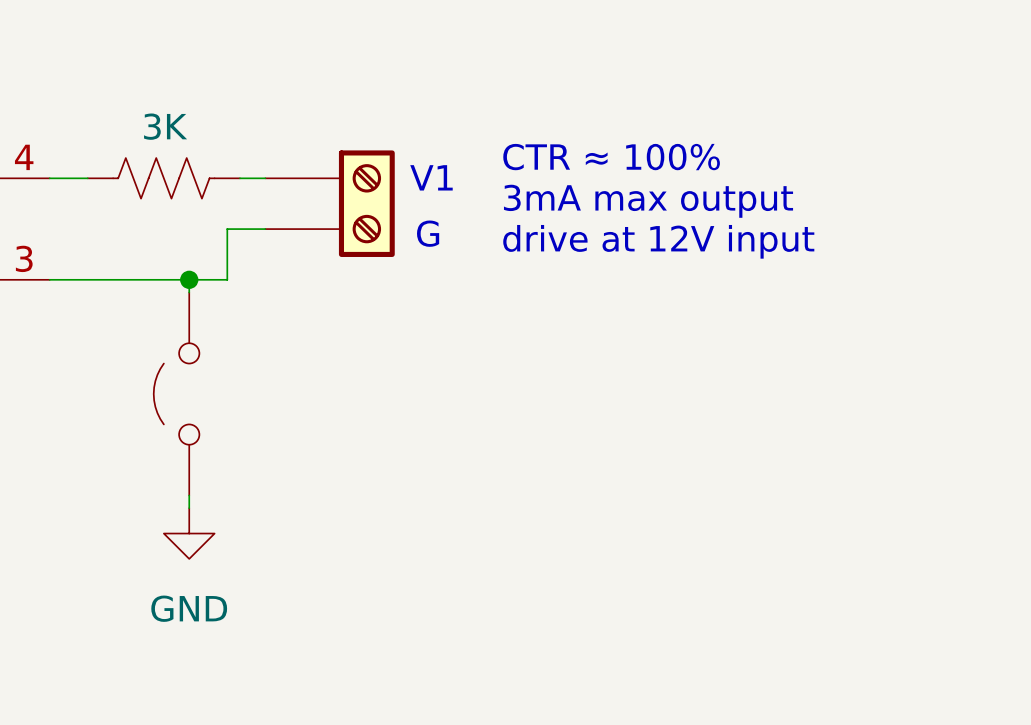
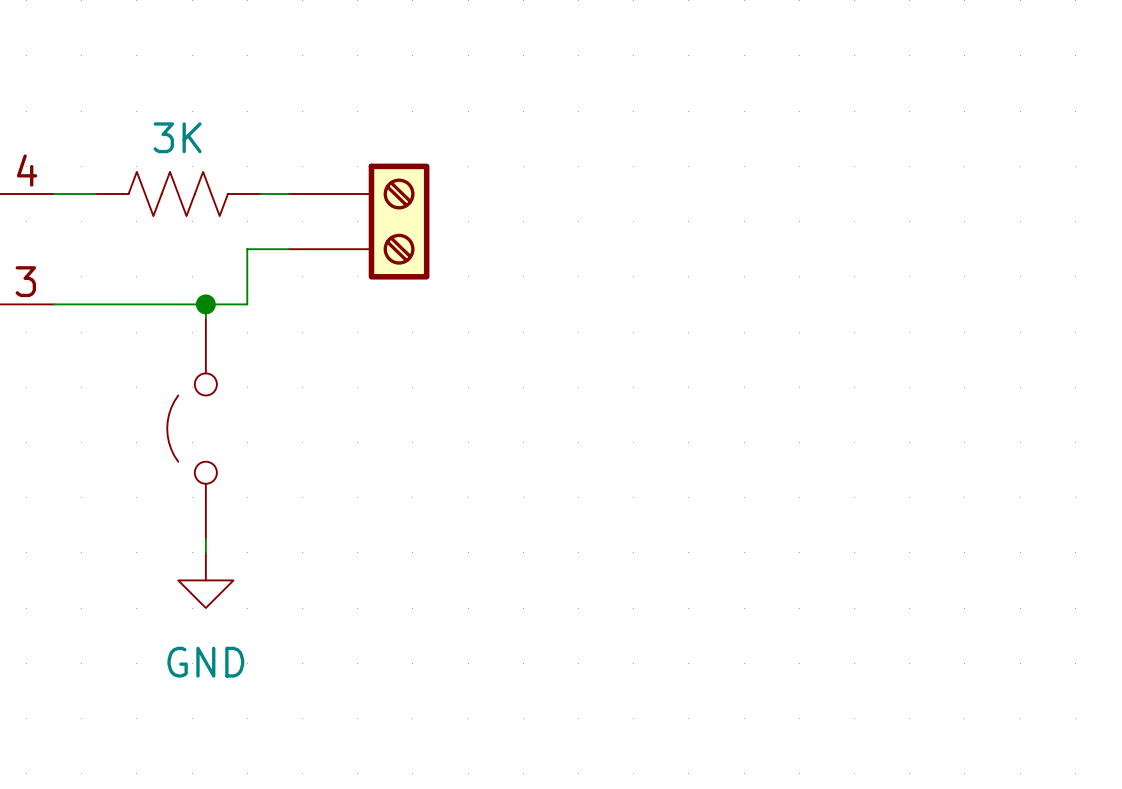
text: CTR ≈ 100% (611, 157) -> none
text: V1 (431, 177) -> none
text: 3mA max output (648, 201) -> none
text: G (428, 233) -> none
text: drive at 12V input (658, 241) -> none

